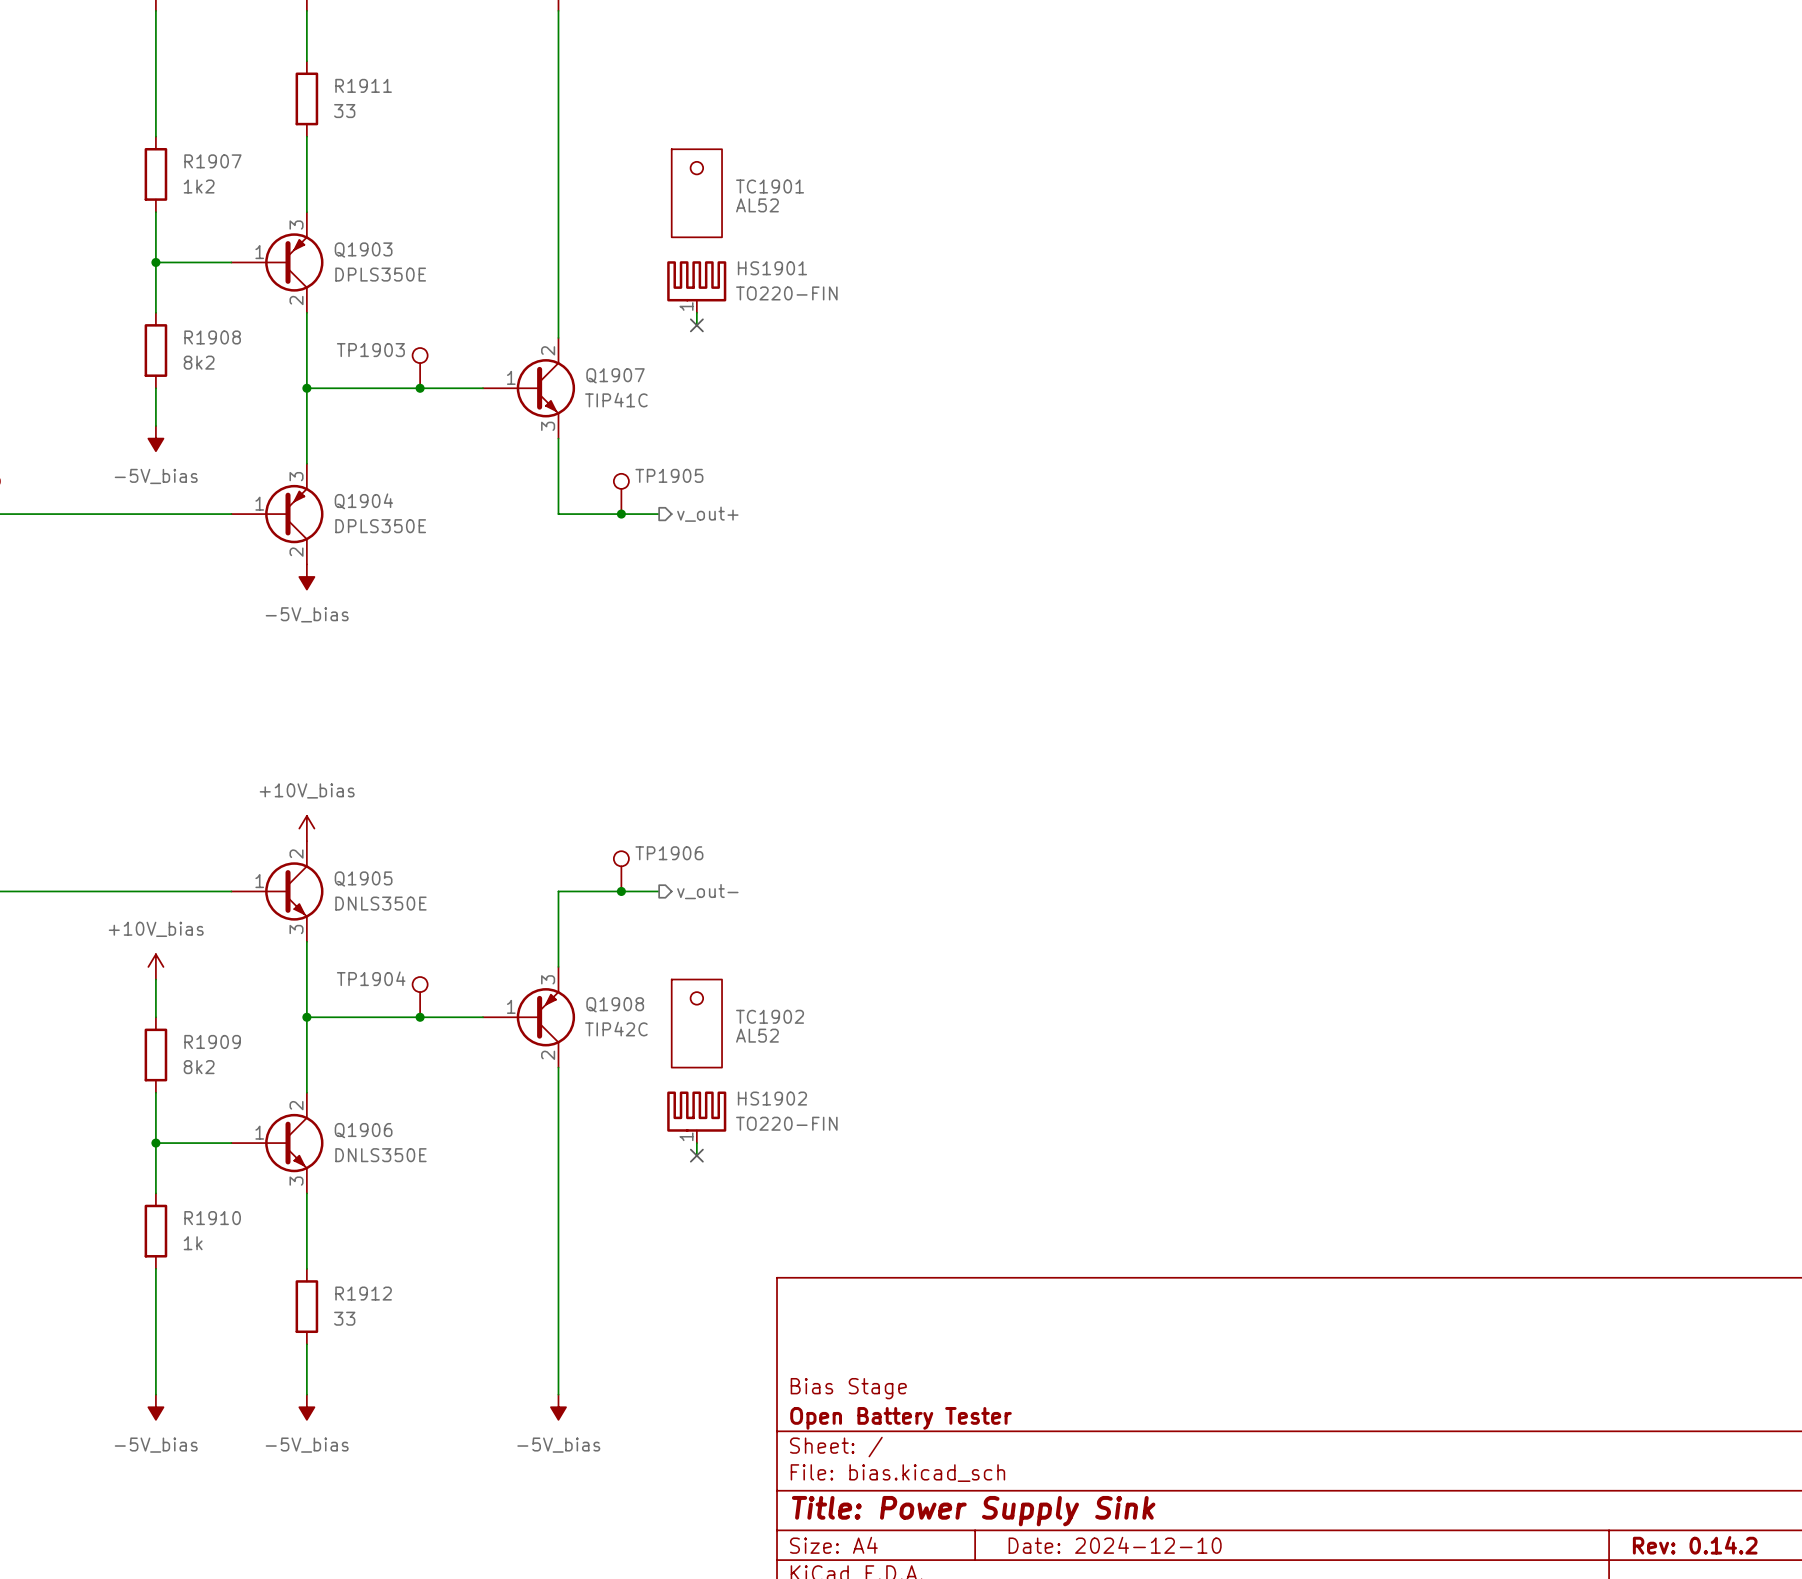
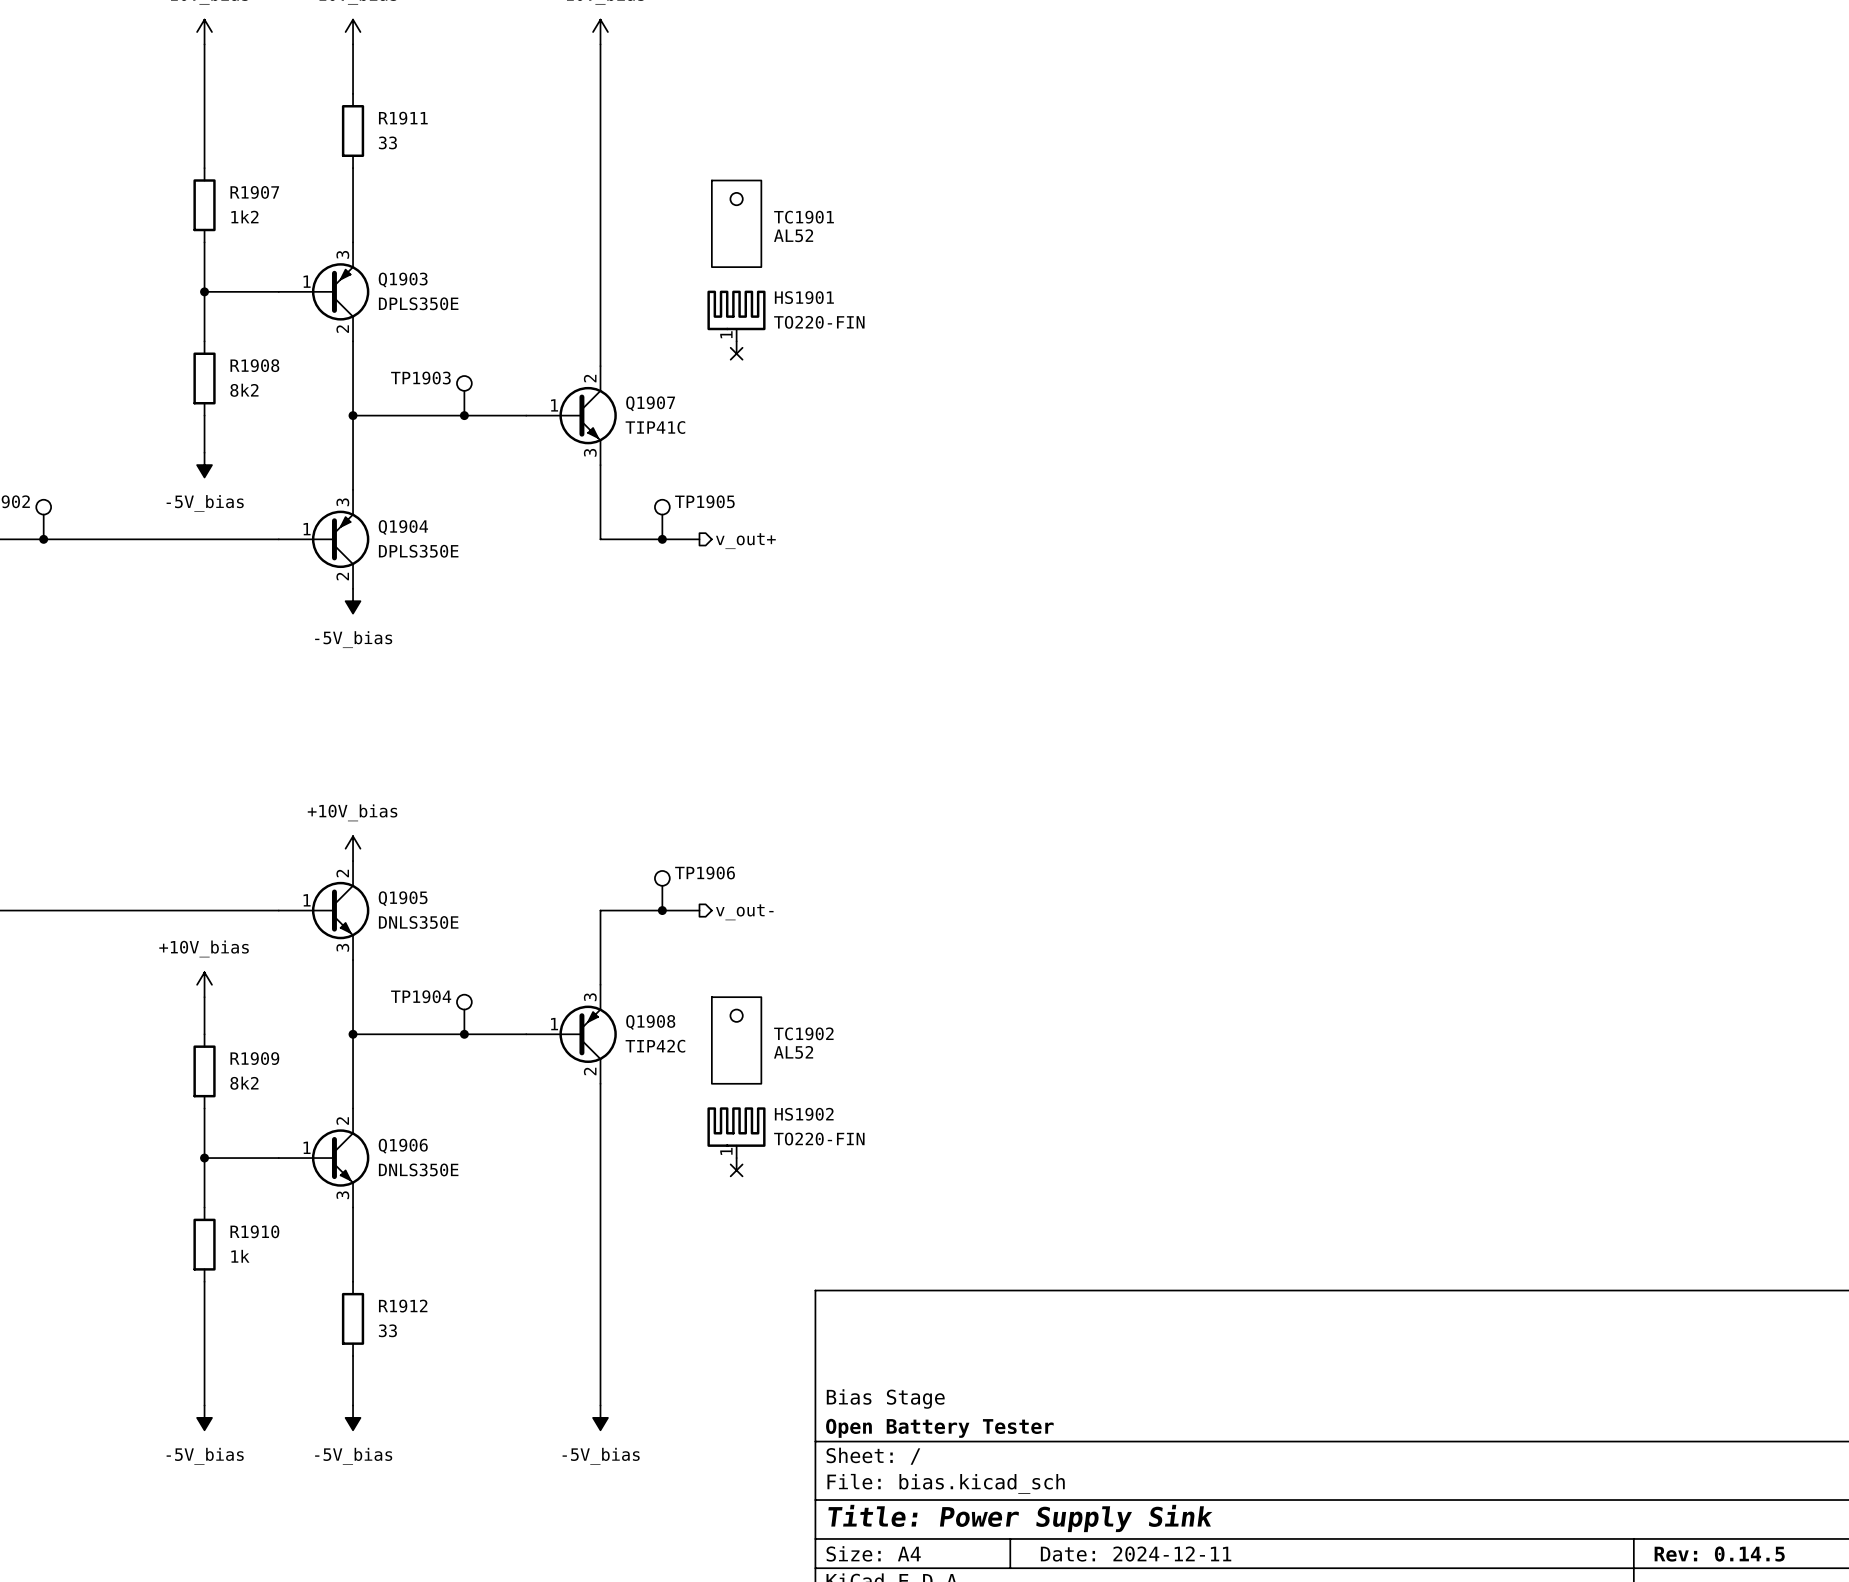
title block: Date: 2024-12-10 (1115, 1545) -> Date: 2024-12-11 (1136, 1554)
title block: Rev: 0.14.2 (1695, 1545) -> Rev: 0.14.5 (1719, 1554)

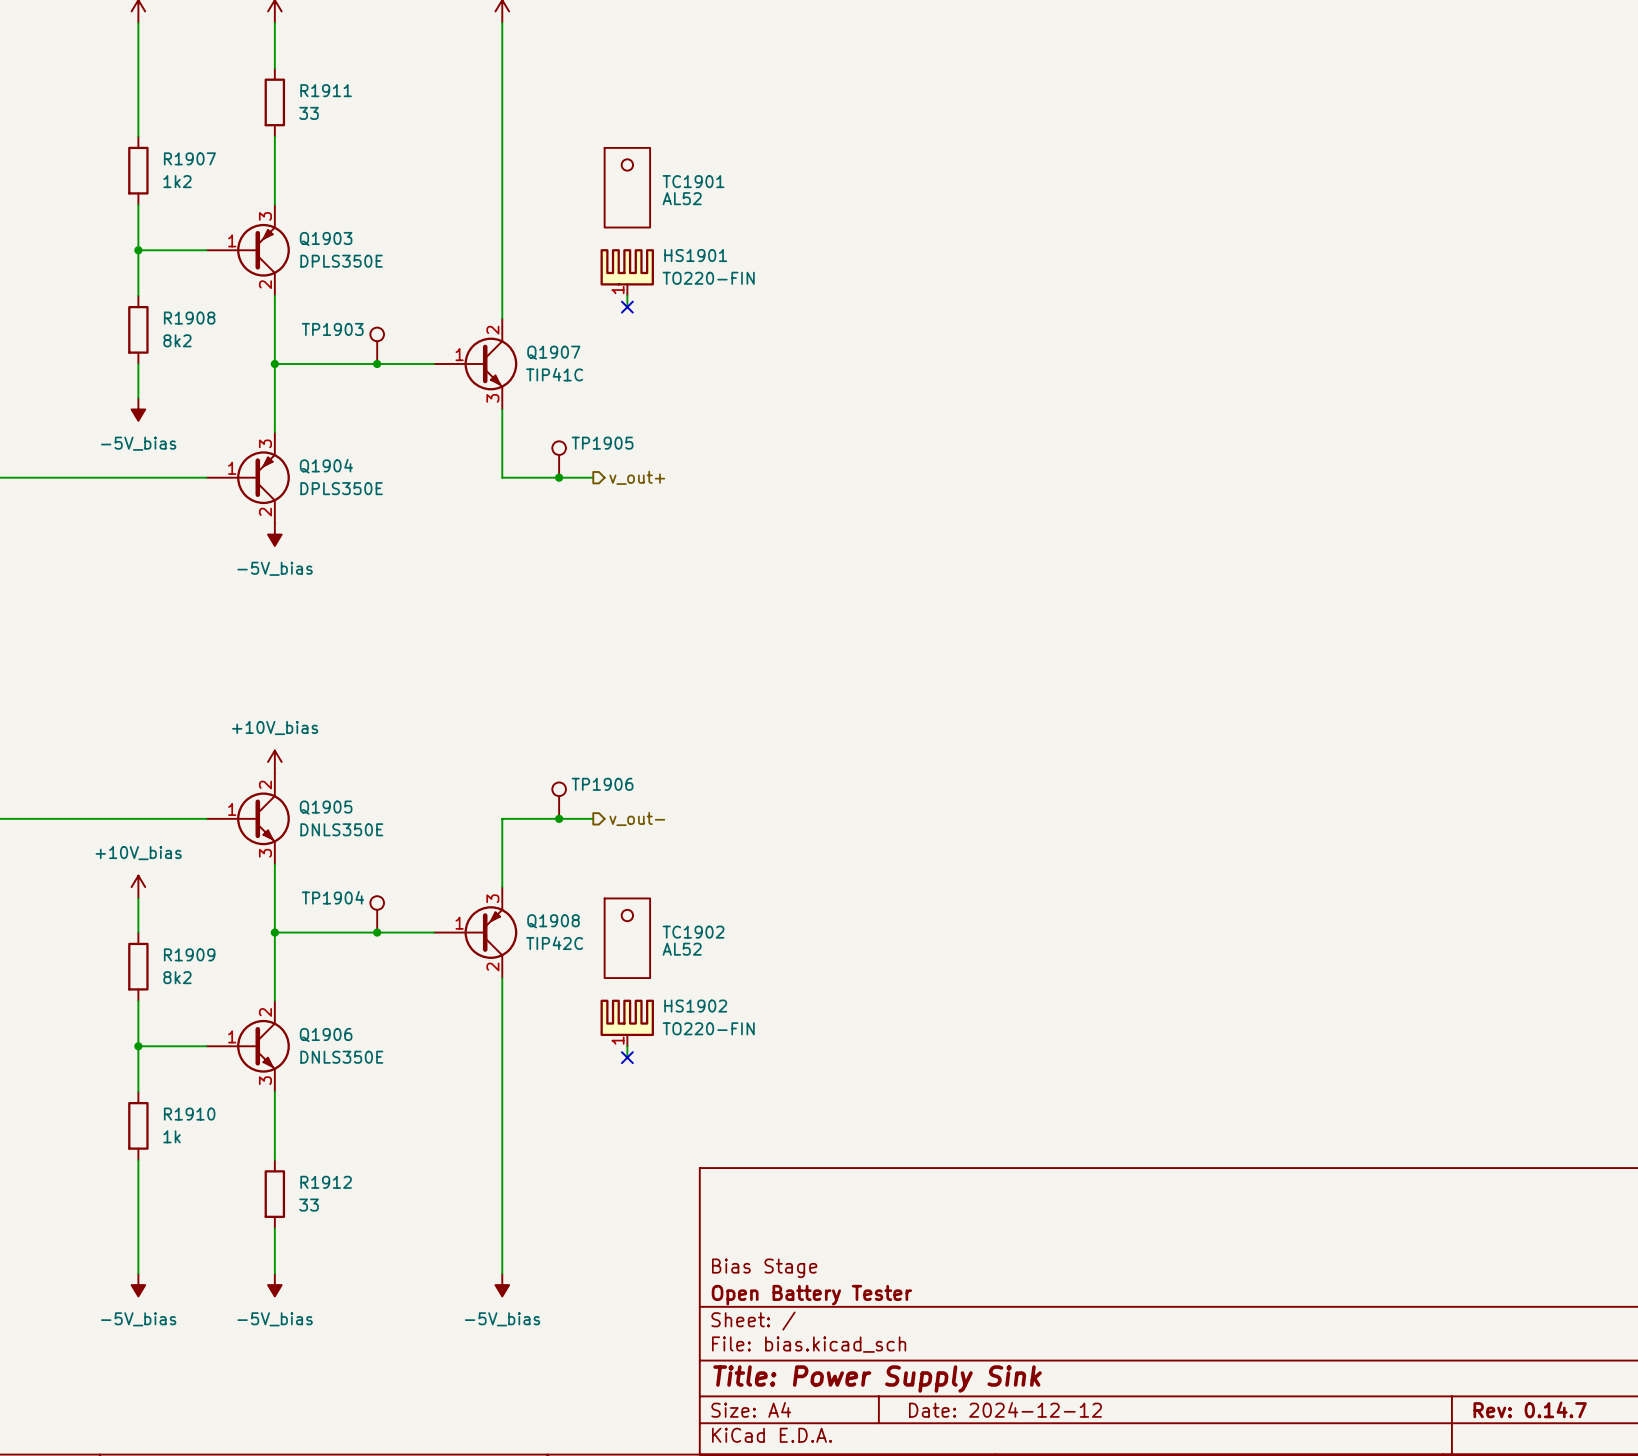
title block: Date: 2024-12-11 (1136, 1554) -> Date: 2024-12-12 (1005, 1409)
title block: Rev: 0.14.5 (1719, 1554) -> Rev: 0.14.7 (1530, 1409)

